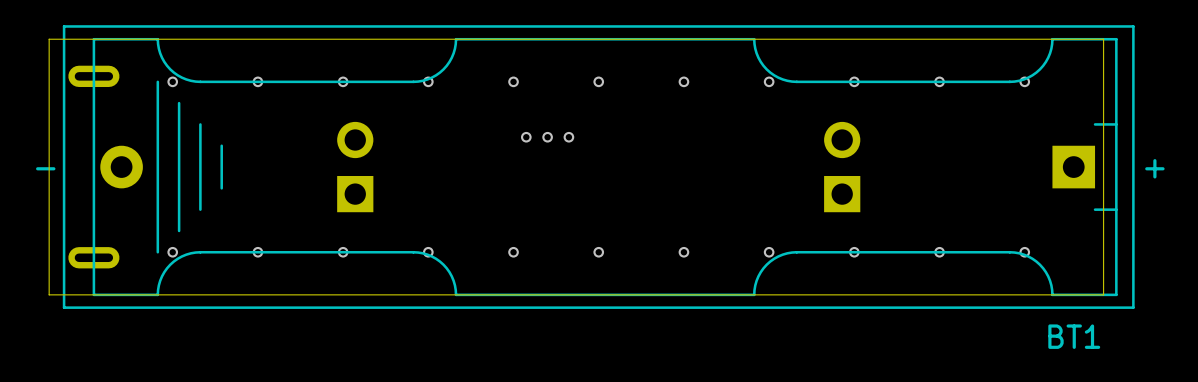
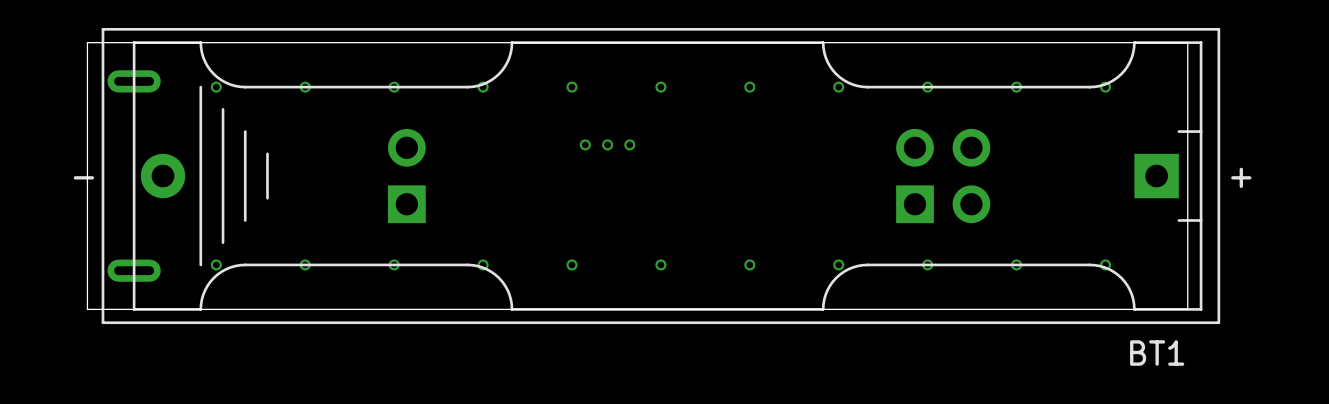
part: none -> (943, 176)

